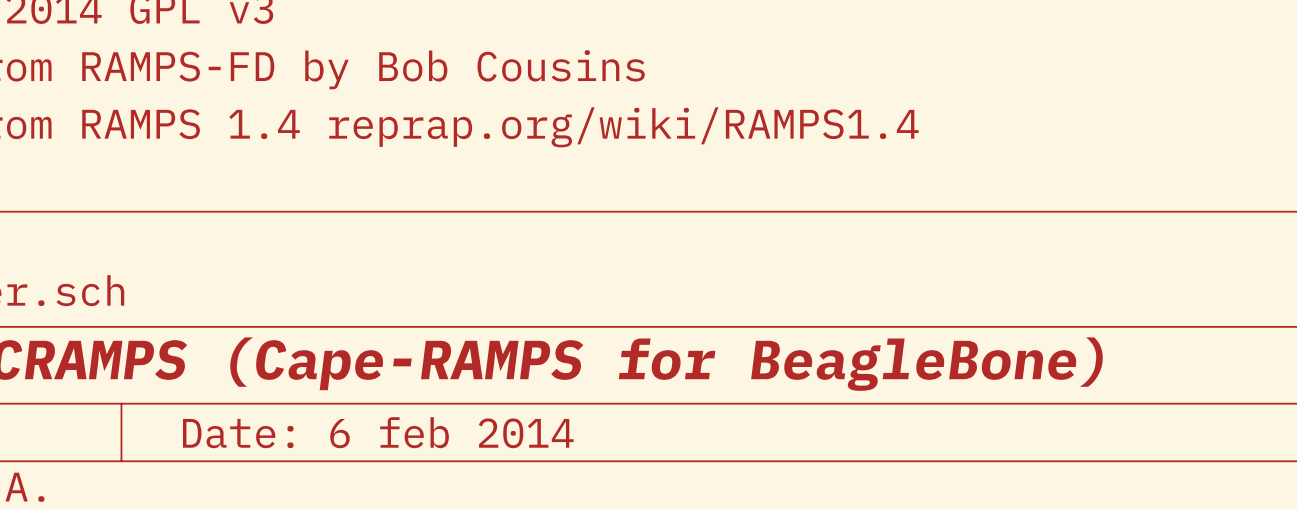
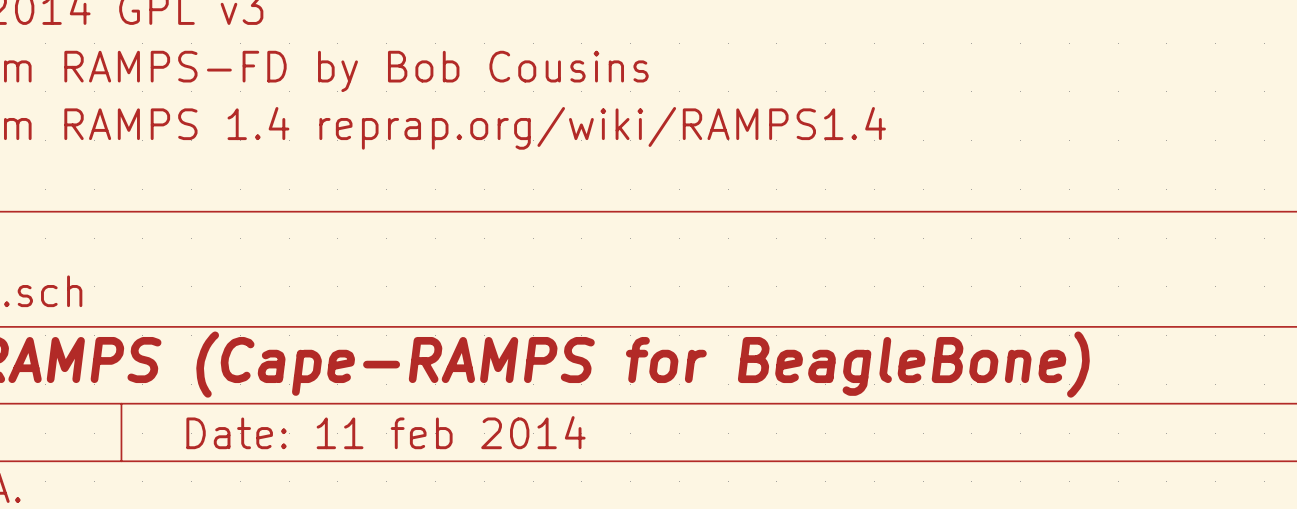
title block: Date: 6 feb 2014 (378, 432) -> Date: 11 feb 2014 (385, 432)

